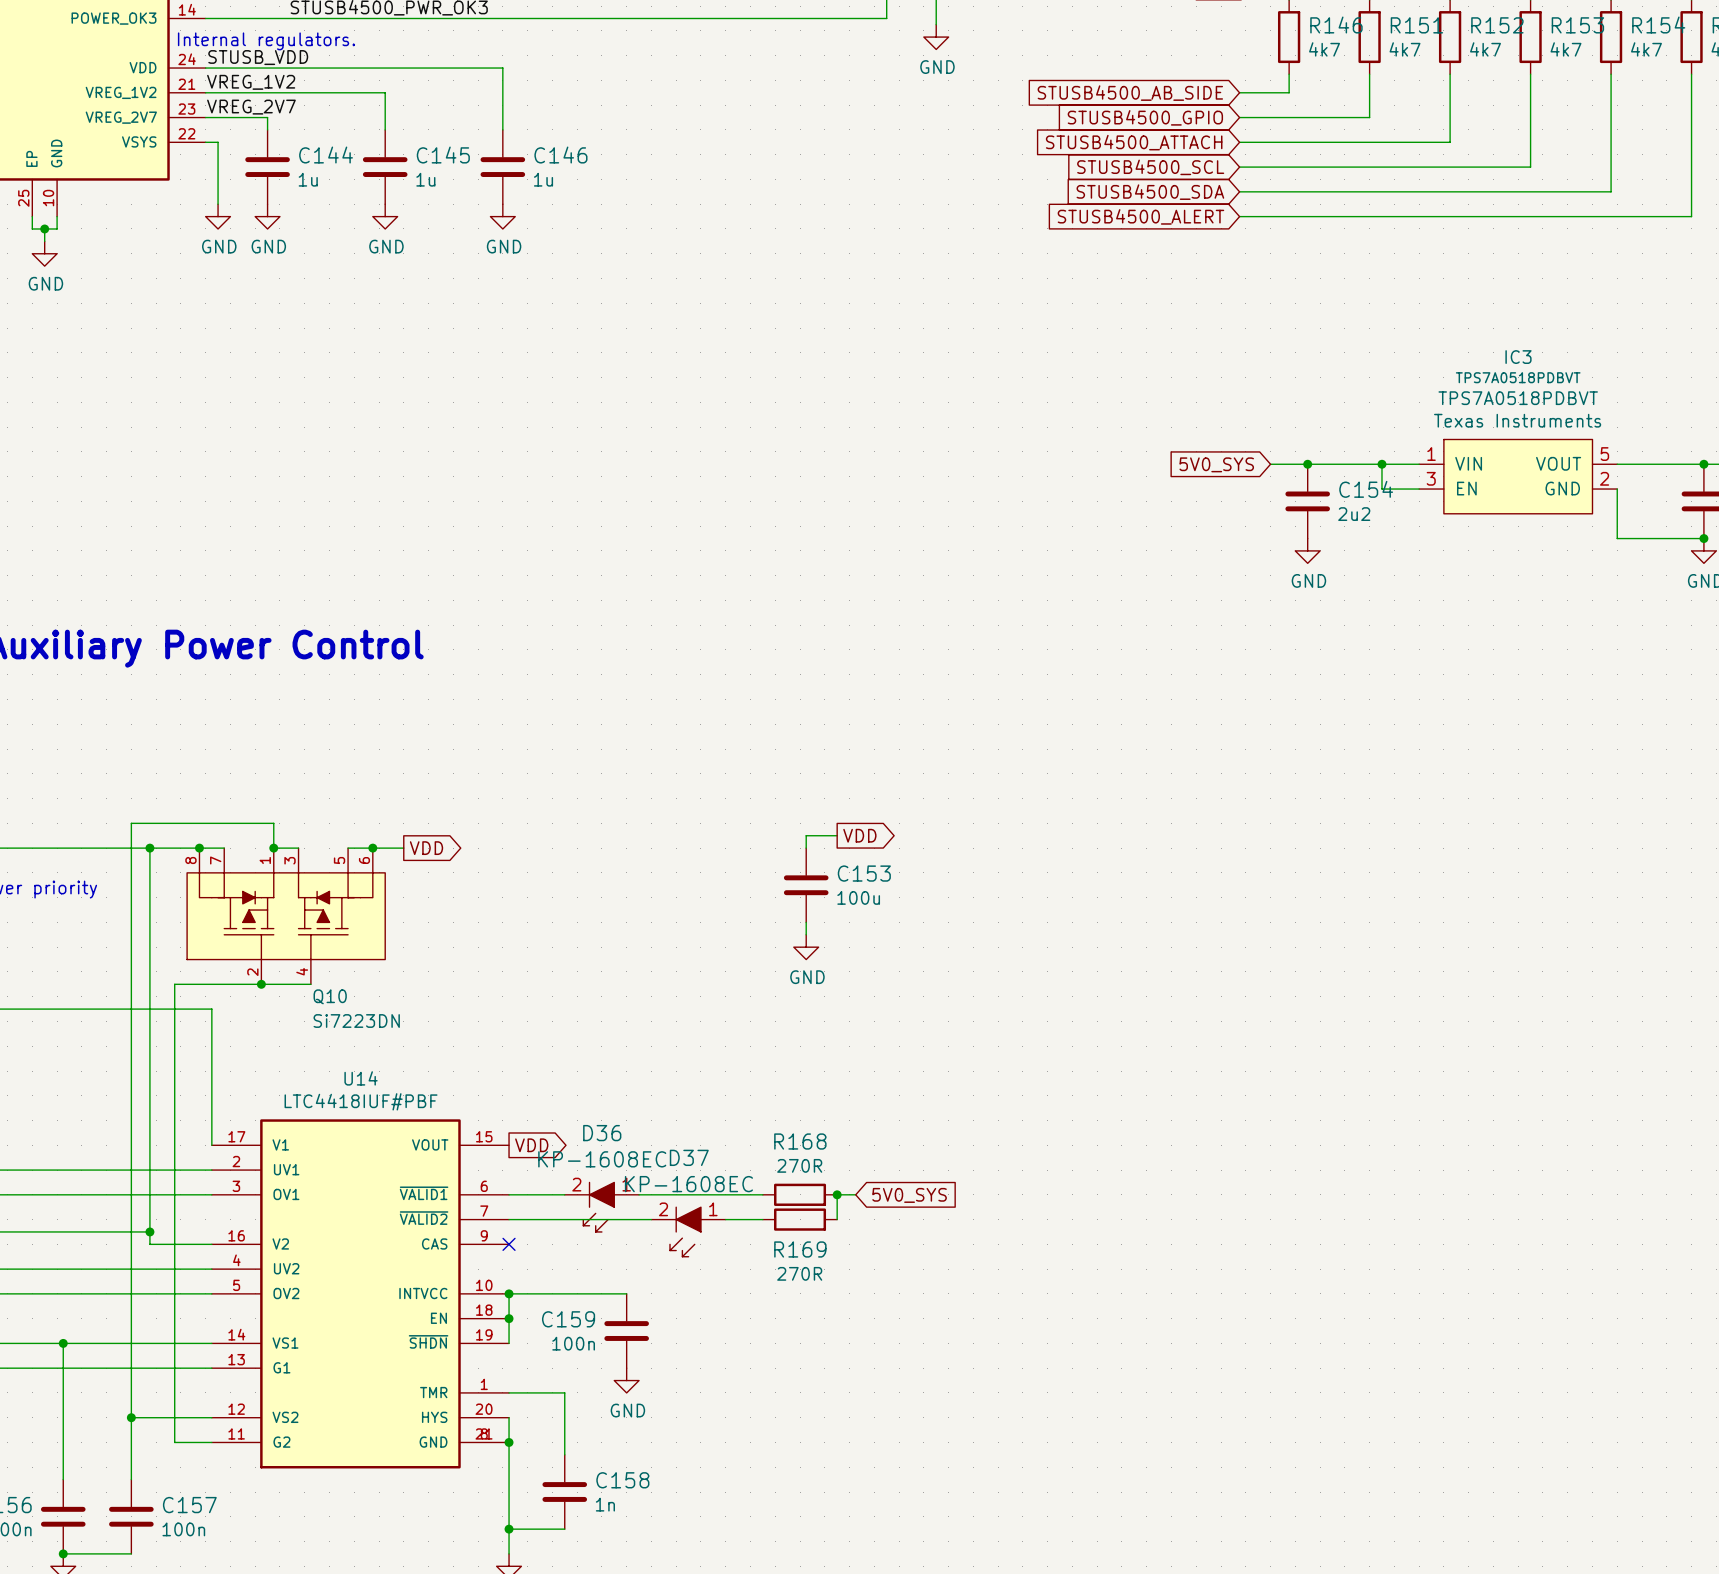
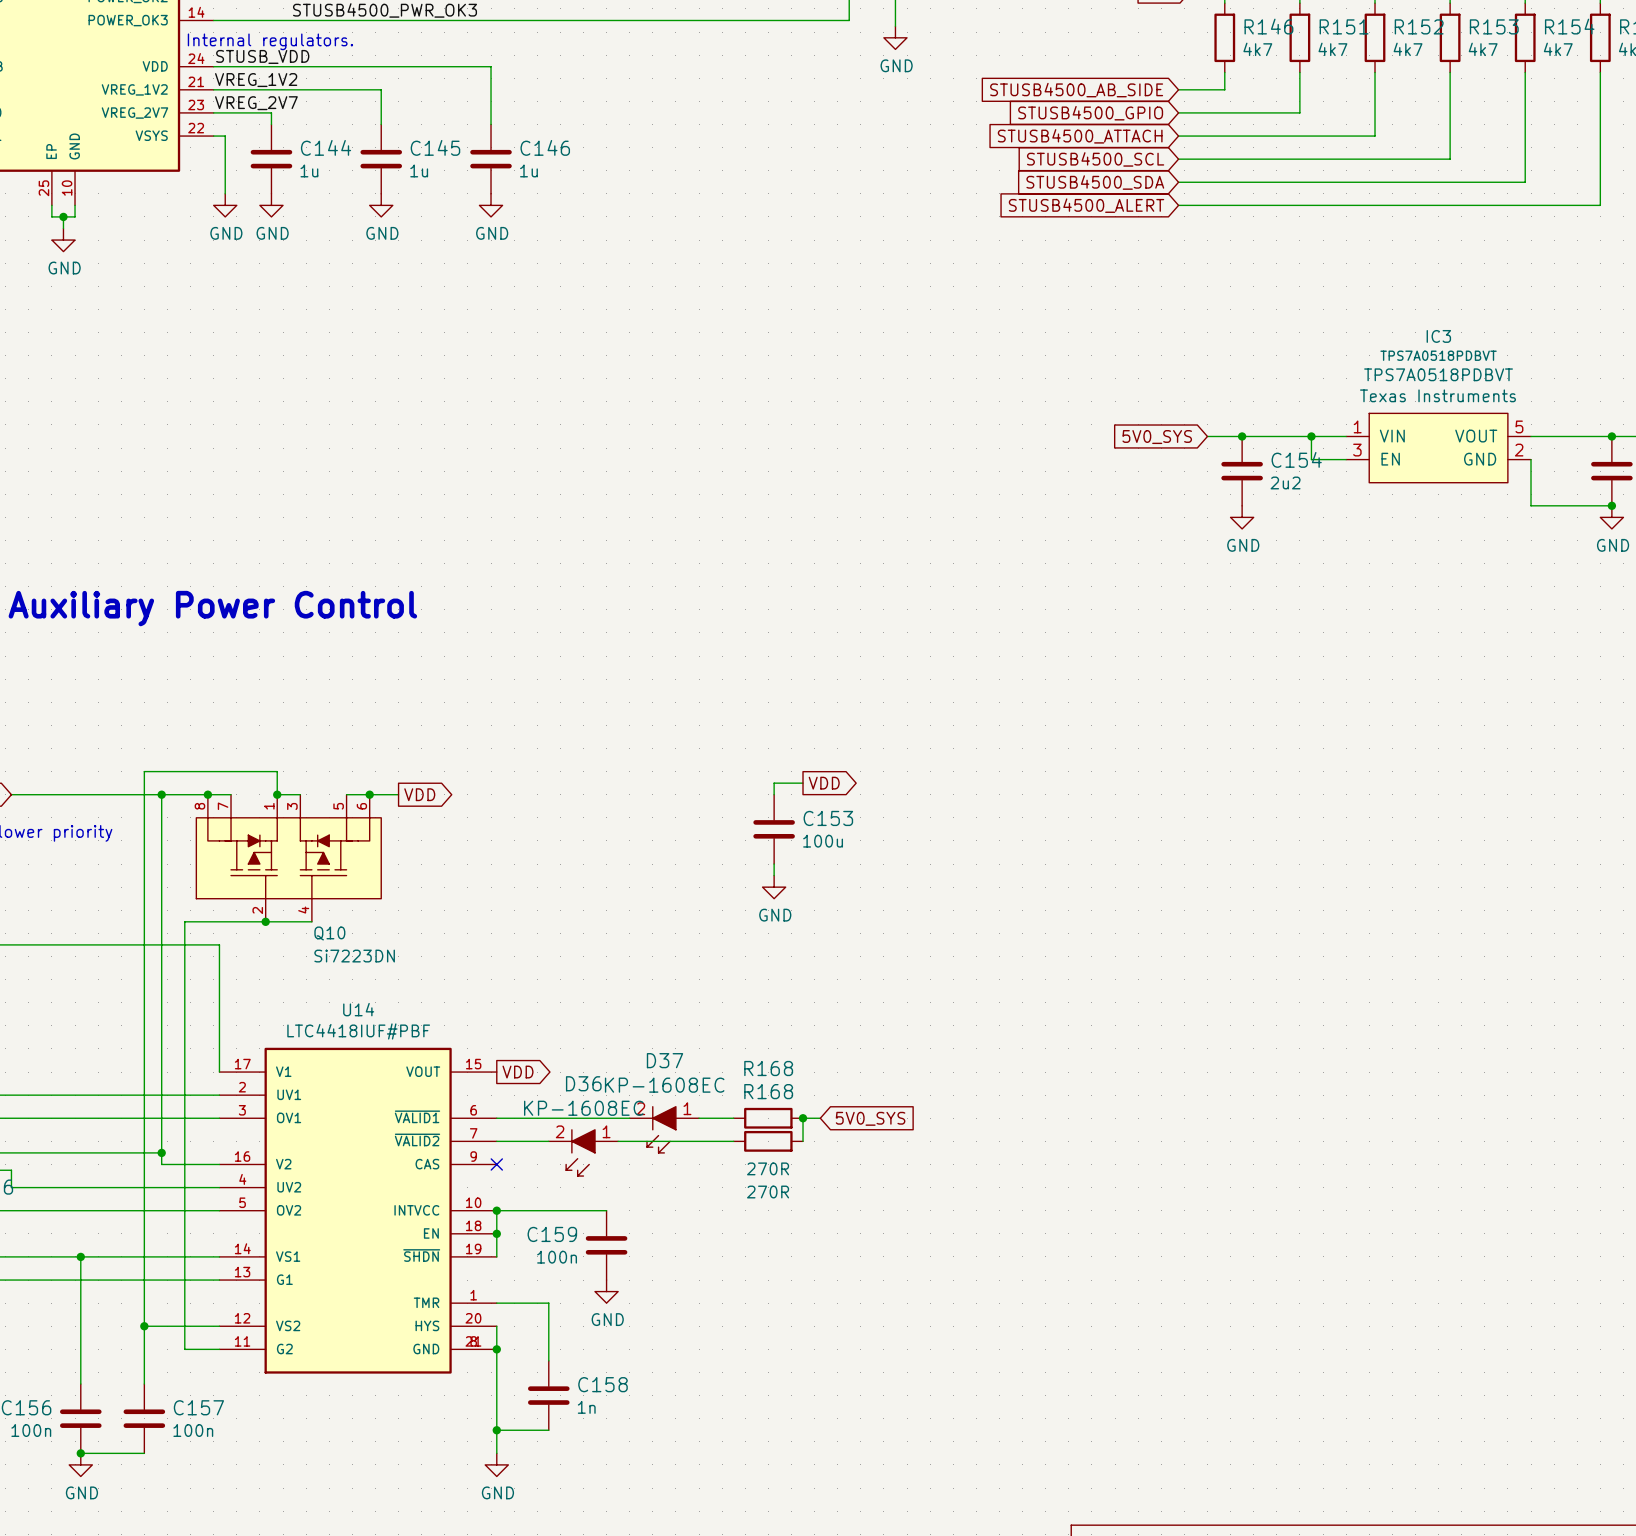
R168 text position: 270R (799, 1165) -> 270R (768, 1168)
D36 position: (601, 1207) -> (583, 1152)
D37 position: (688, 1231) -> (664, 1129)
R169 name: R169 (800, 1249) -> R168 (768, 1091)

